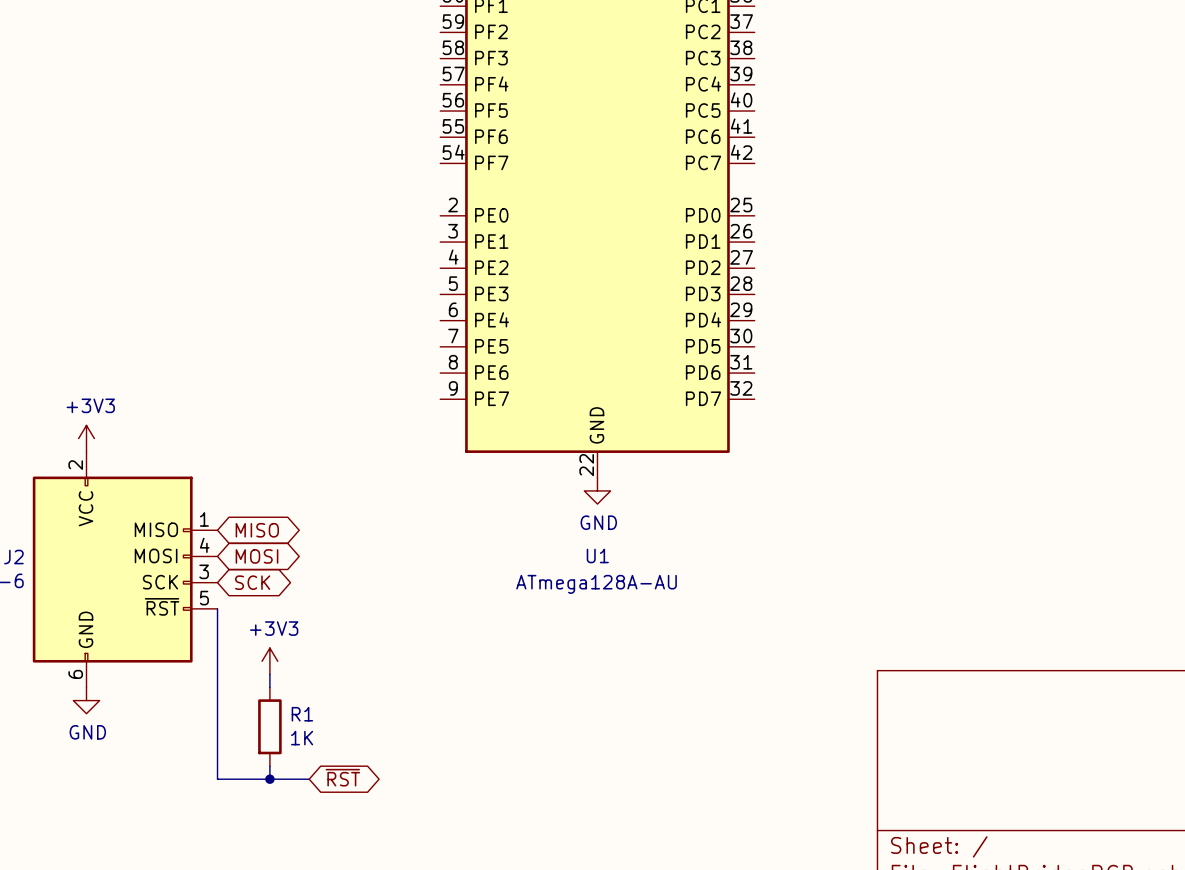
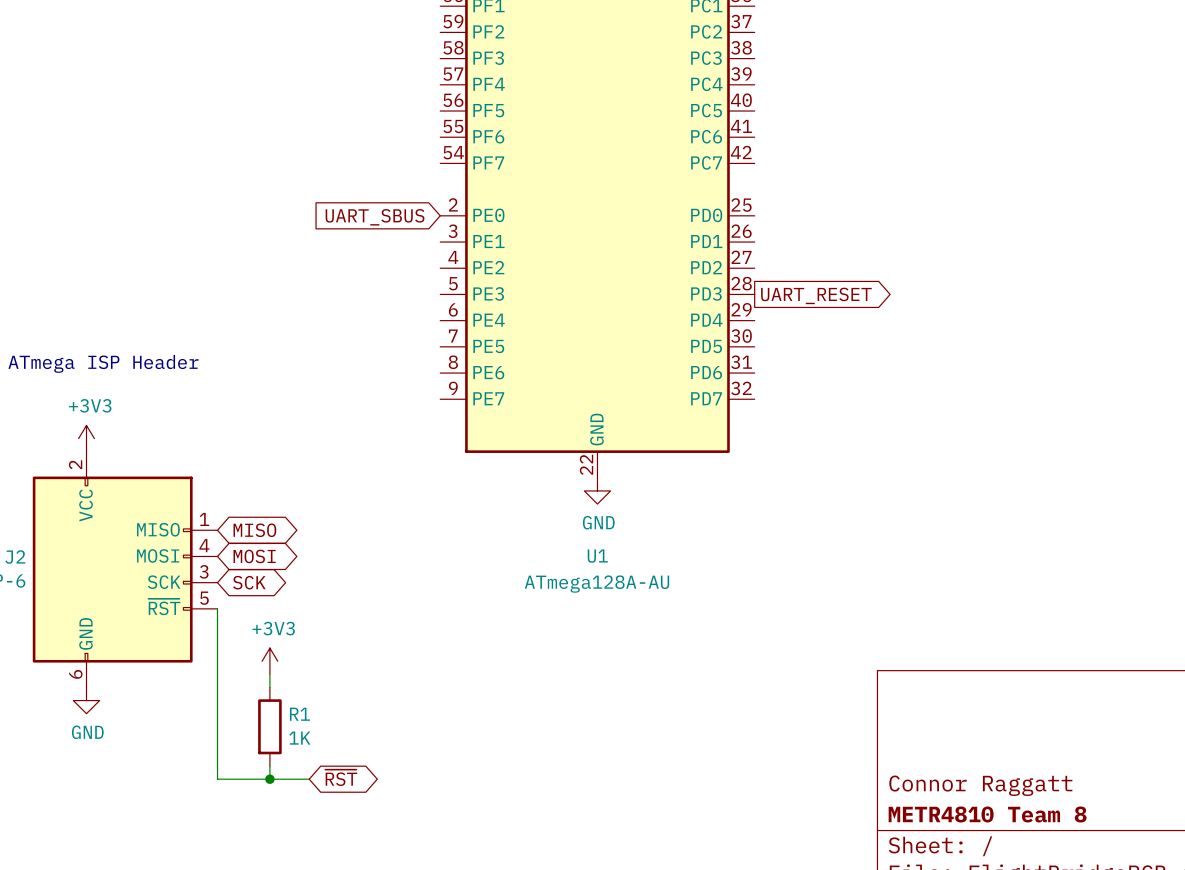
global label: none -> UART_SBUS (375, 217)
global label: none -> UART_RESET (816, 295)
text: none -> ATmega ISP Header (103, 363)
title block: none -> Connor Raggatt (980, 785)
title block: none -> METR4810 Team 8 (987, 814)

